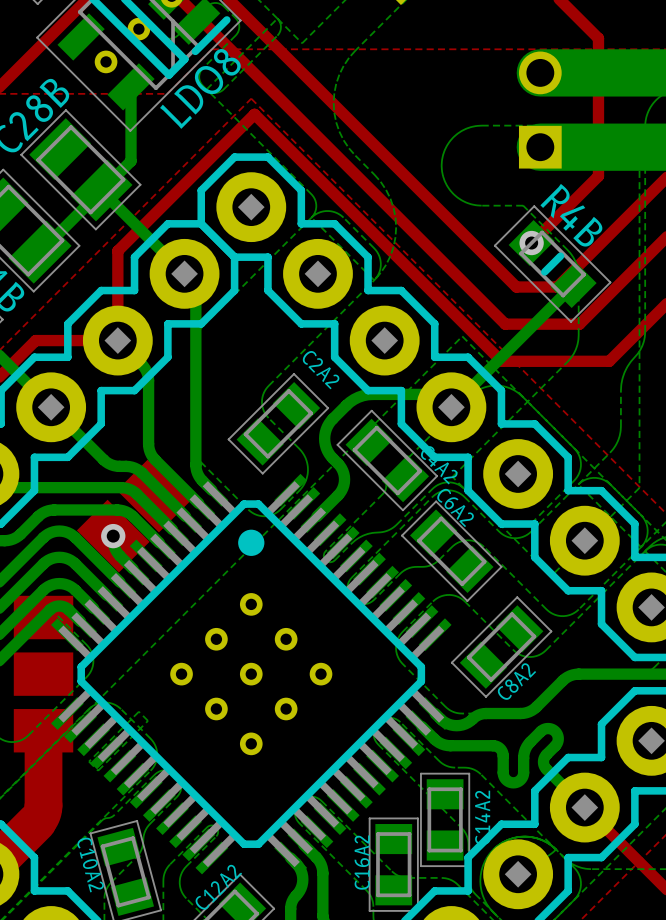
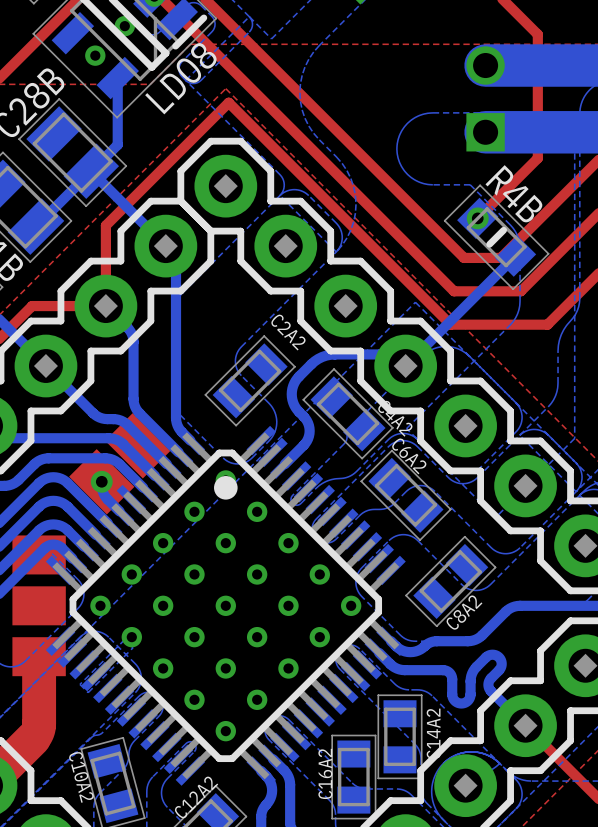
part footprint: [51, 473, 452, 875] -> [45, 425, 406, 786]

